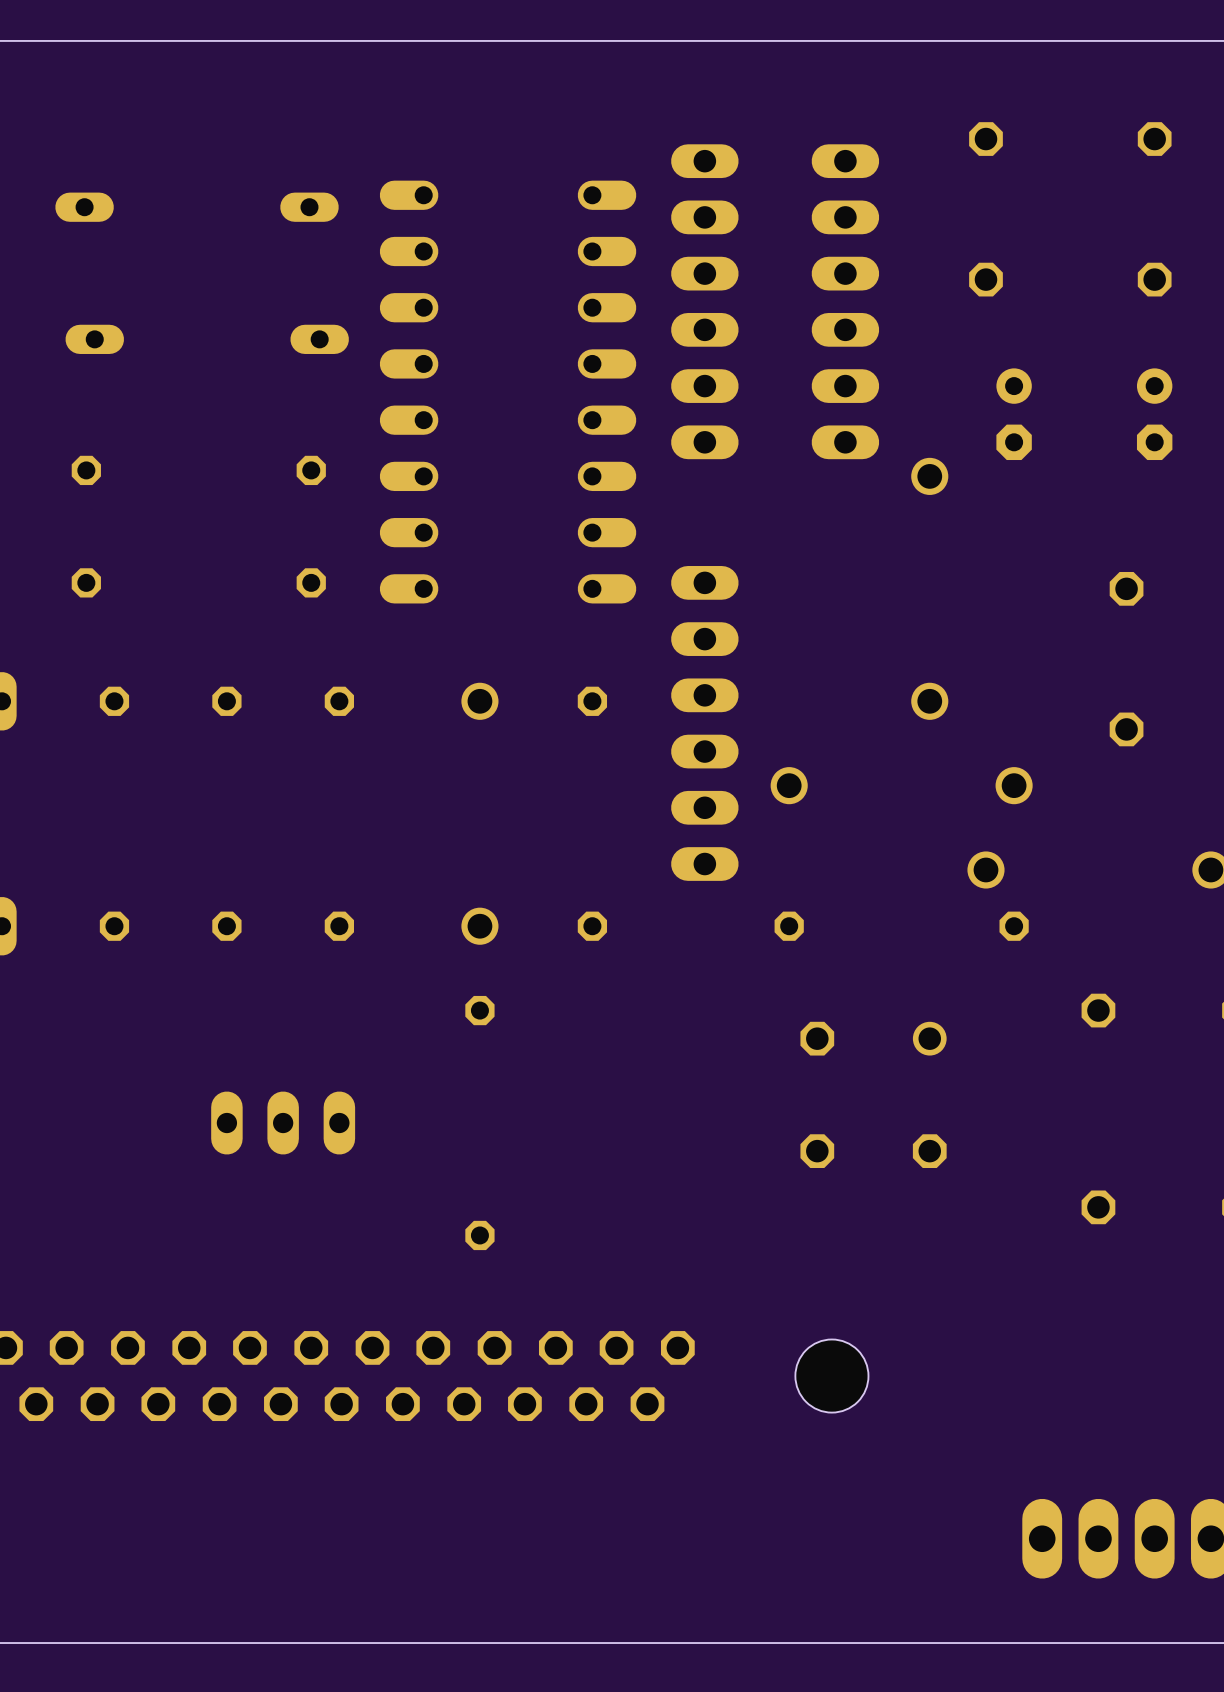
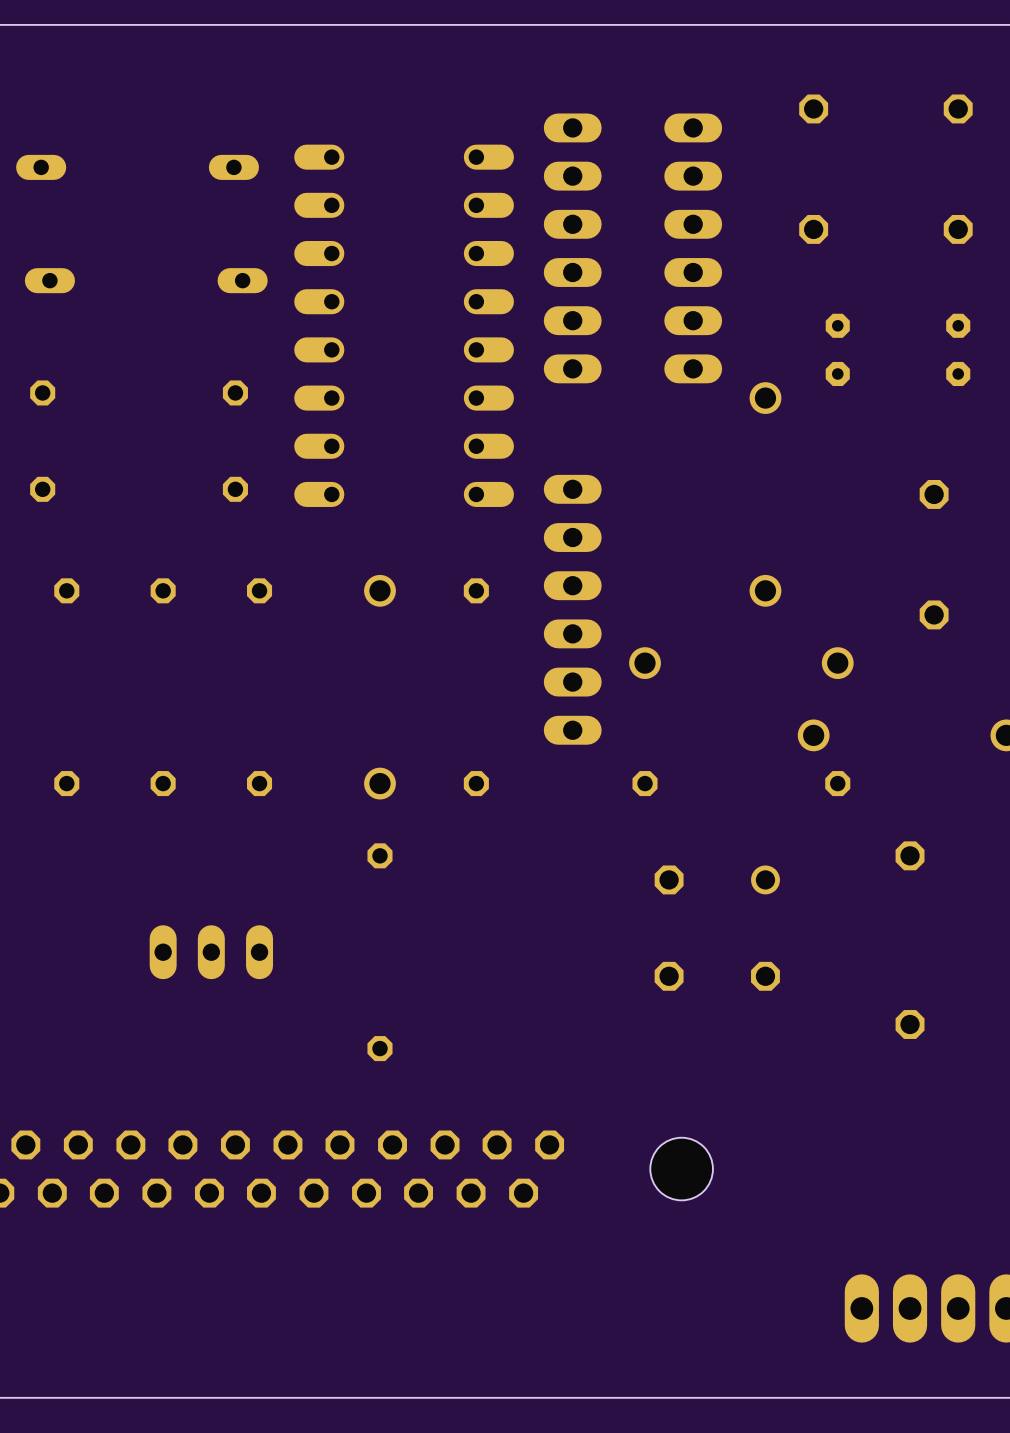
part footprint: [996, 368, 1032, 461] -> [825, 313, 850, 387]
part footprint: [1136, 368, 1173, 461] -> [946, 313, 971, 387]

